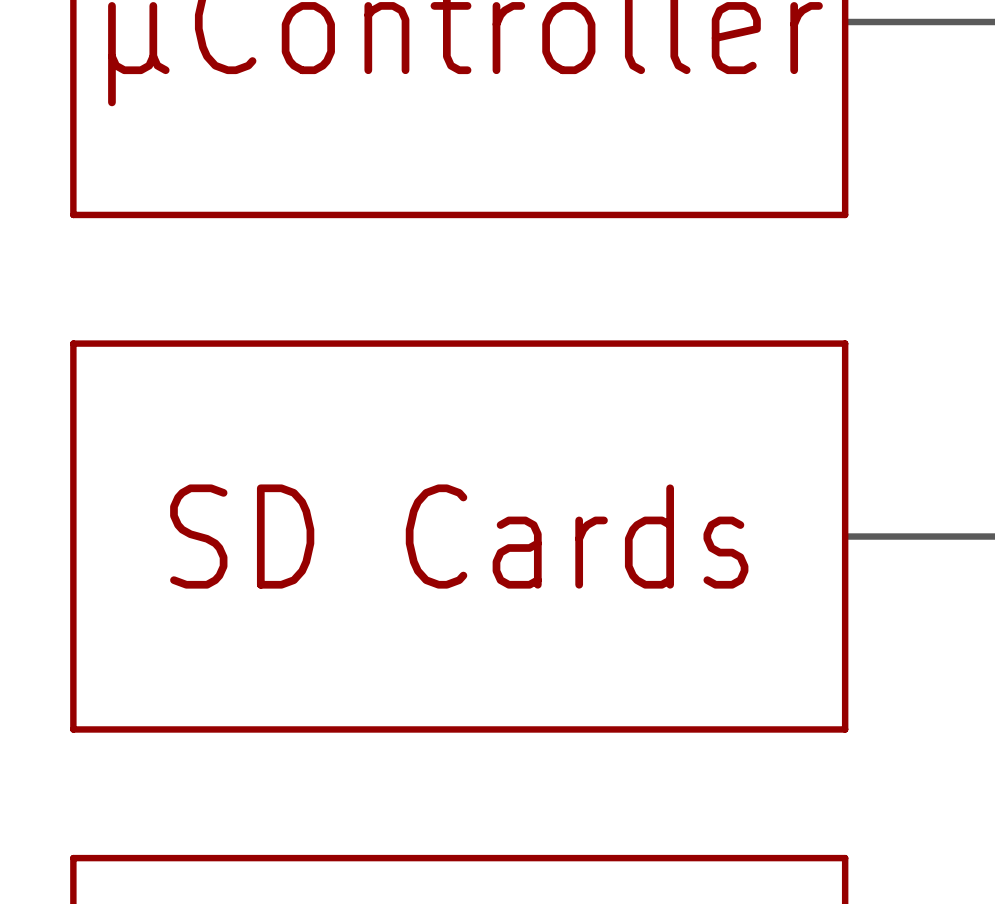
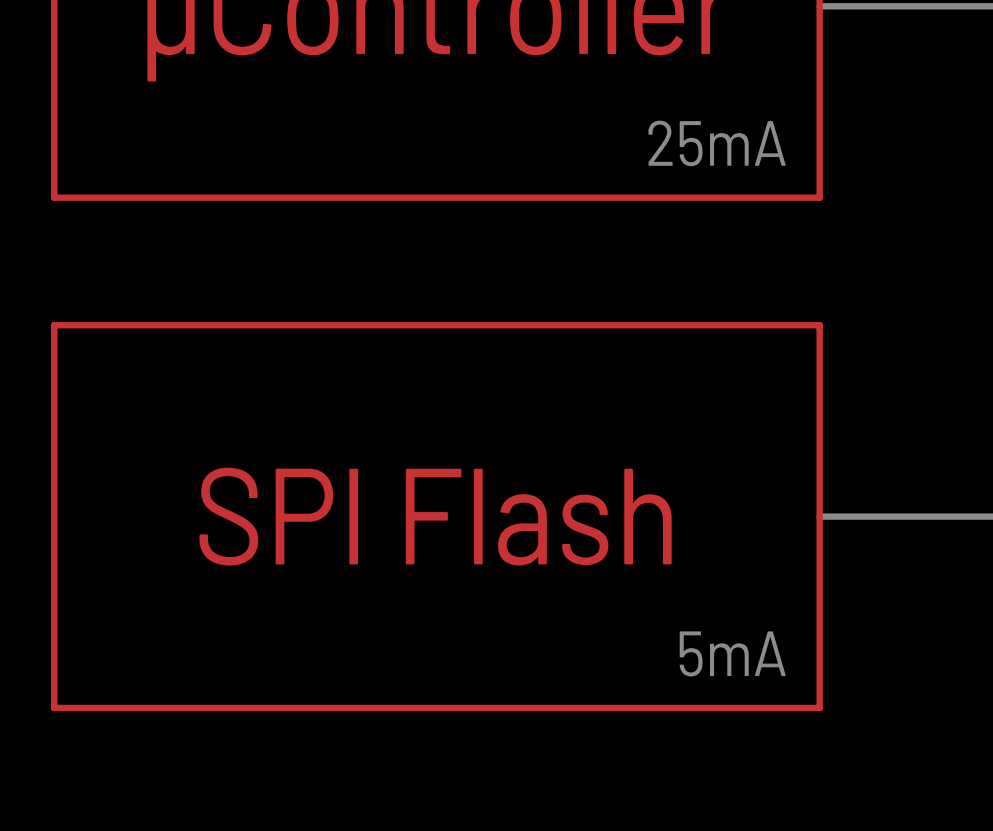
text: none -> 25mA (717, 143)
text: SD Cards (459, 536) -> SPI Flash (435, 516)
text: none -> 5mA (732, 653)

